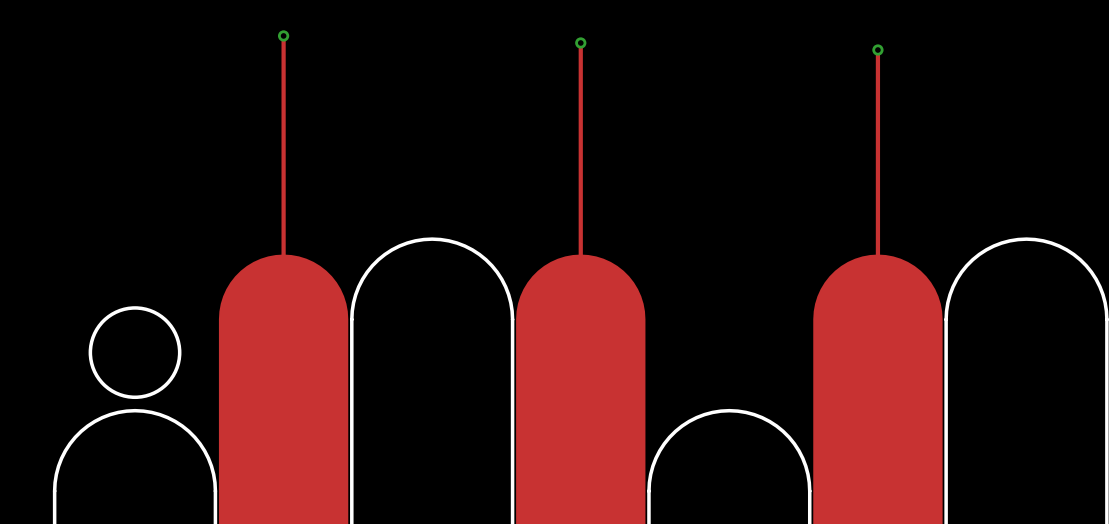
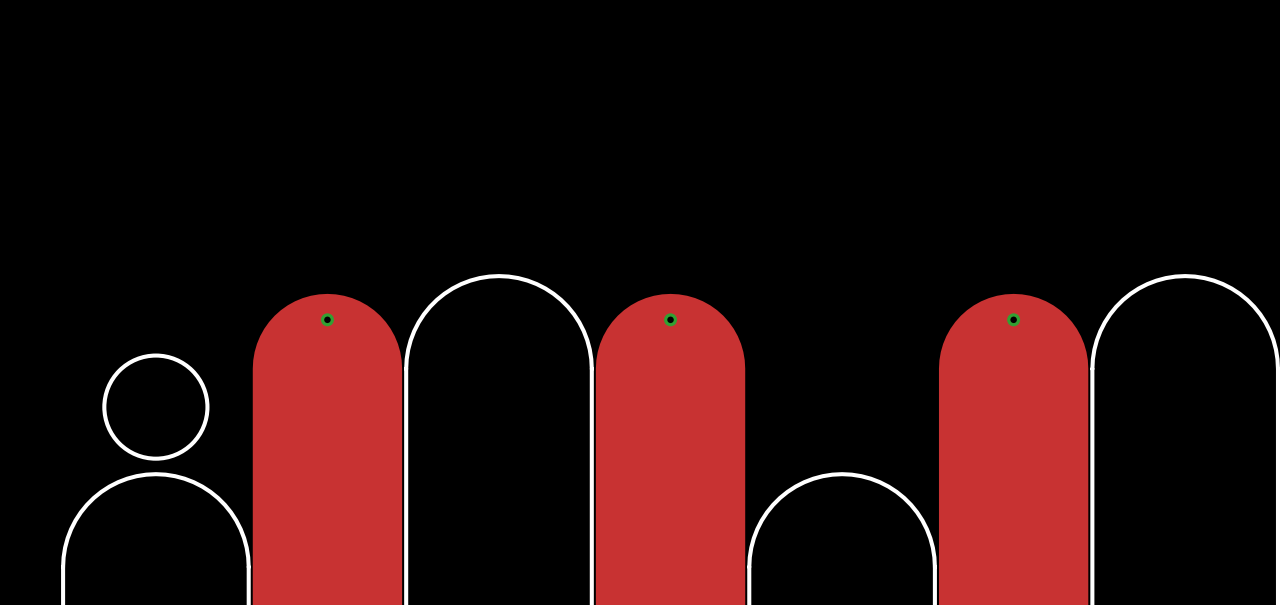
track: (283, 35) (283, 294) -> none
via: (283, 35) -> none
track: (580, 42) (580, 294) -> none
via: (580, 42) -> none
track: (877, 50) (877, 294) -> none
via: (877, 50) -> none
via: none -> (327, 319)
via: none -> (670, 319)
via: none -> (1013, 319)

